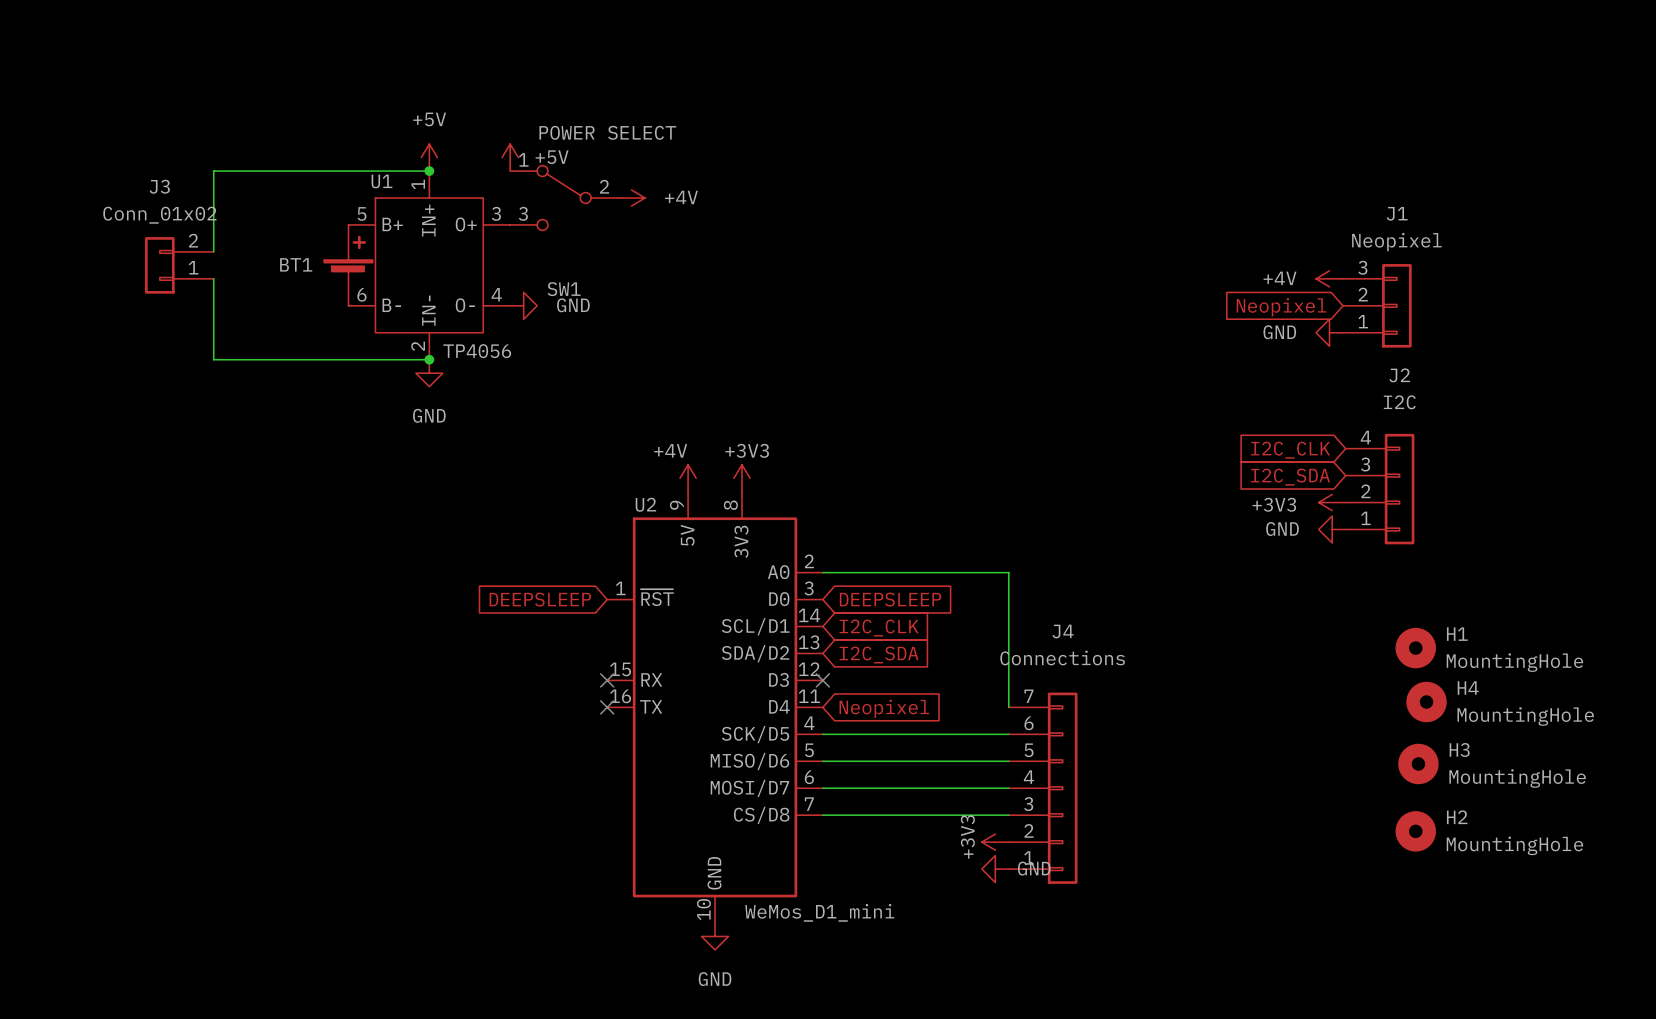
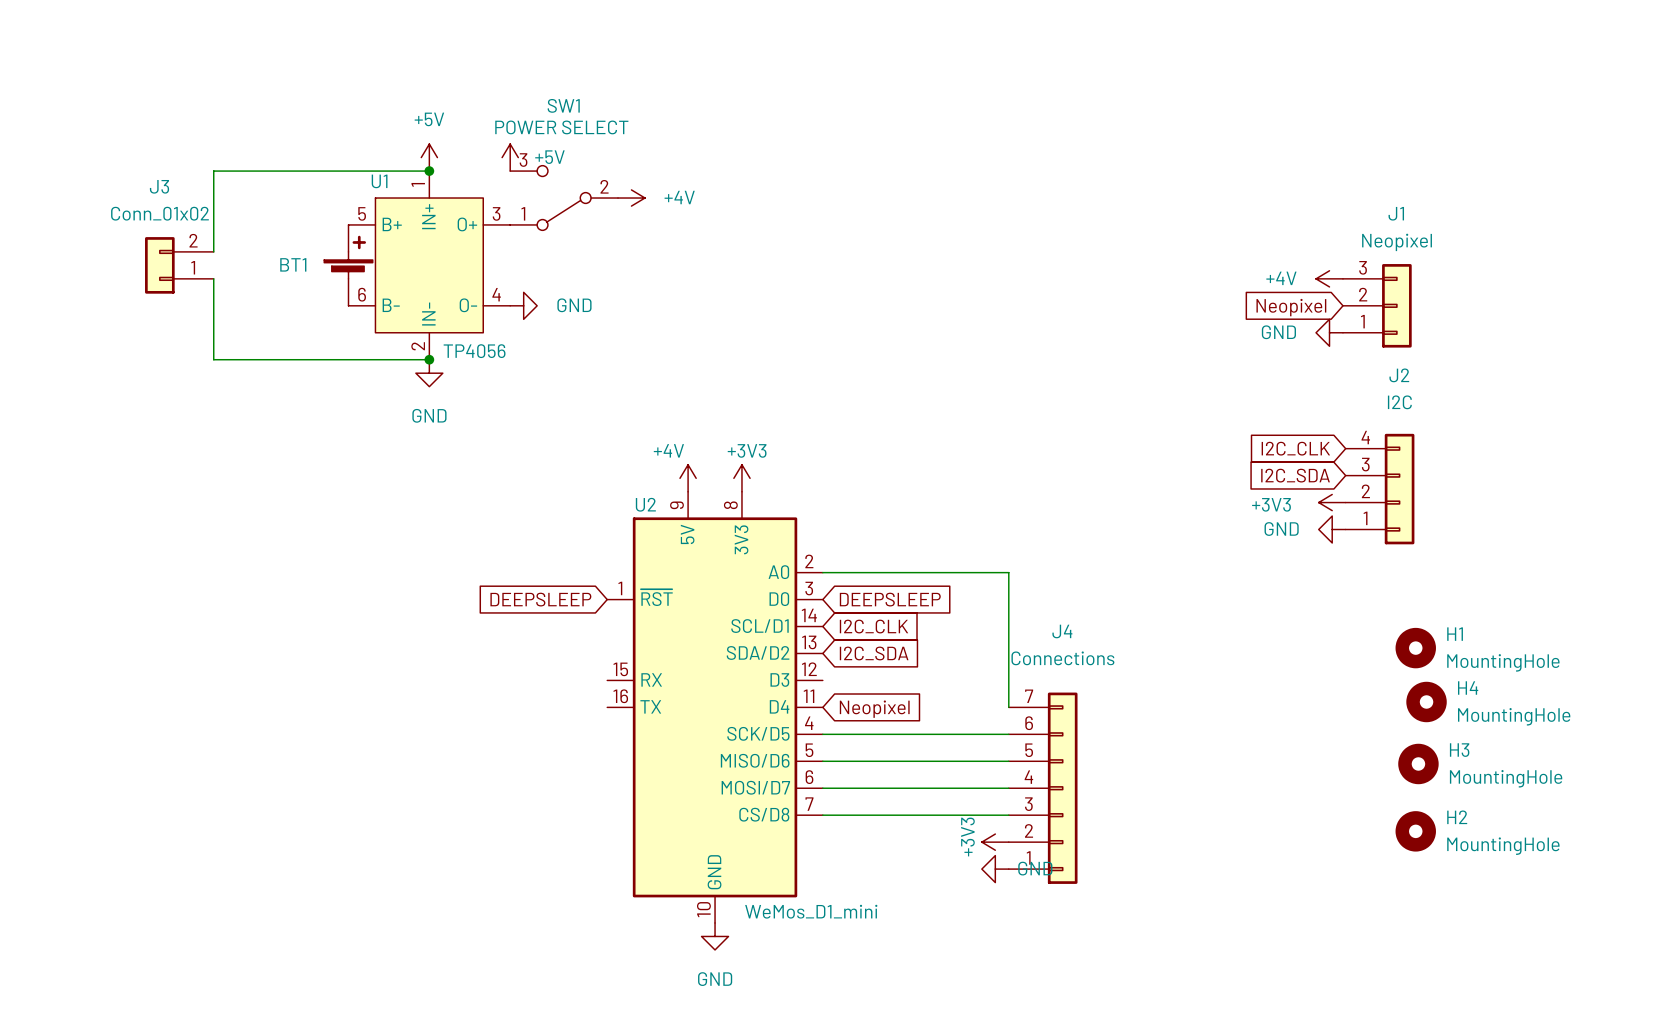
SW1 value position: POWER SELECT (607, 132) -> POWER SELECT (561, 127)
SW1 flip: as is (564, 198) -> up-down (564, 198)
no-connect mark: (607, 680) -> none
no-connect mark: (822, 680) -> none
no-connect mark: (607, 707) -> none

